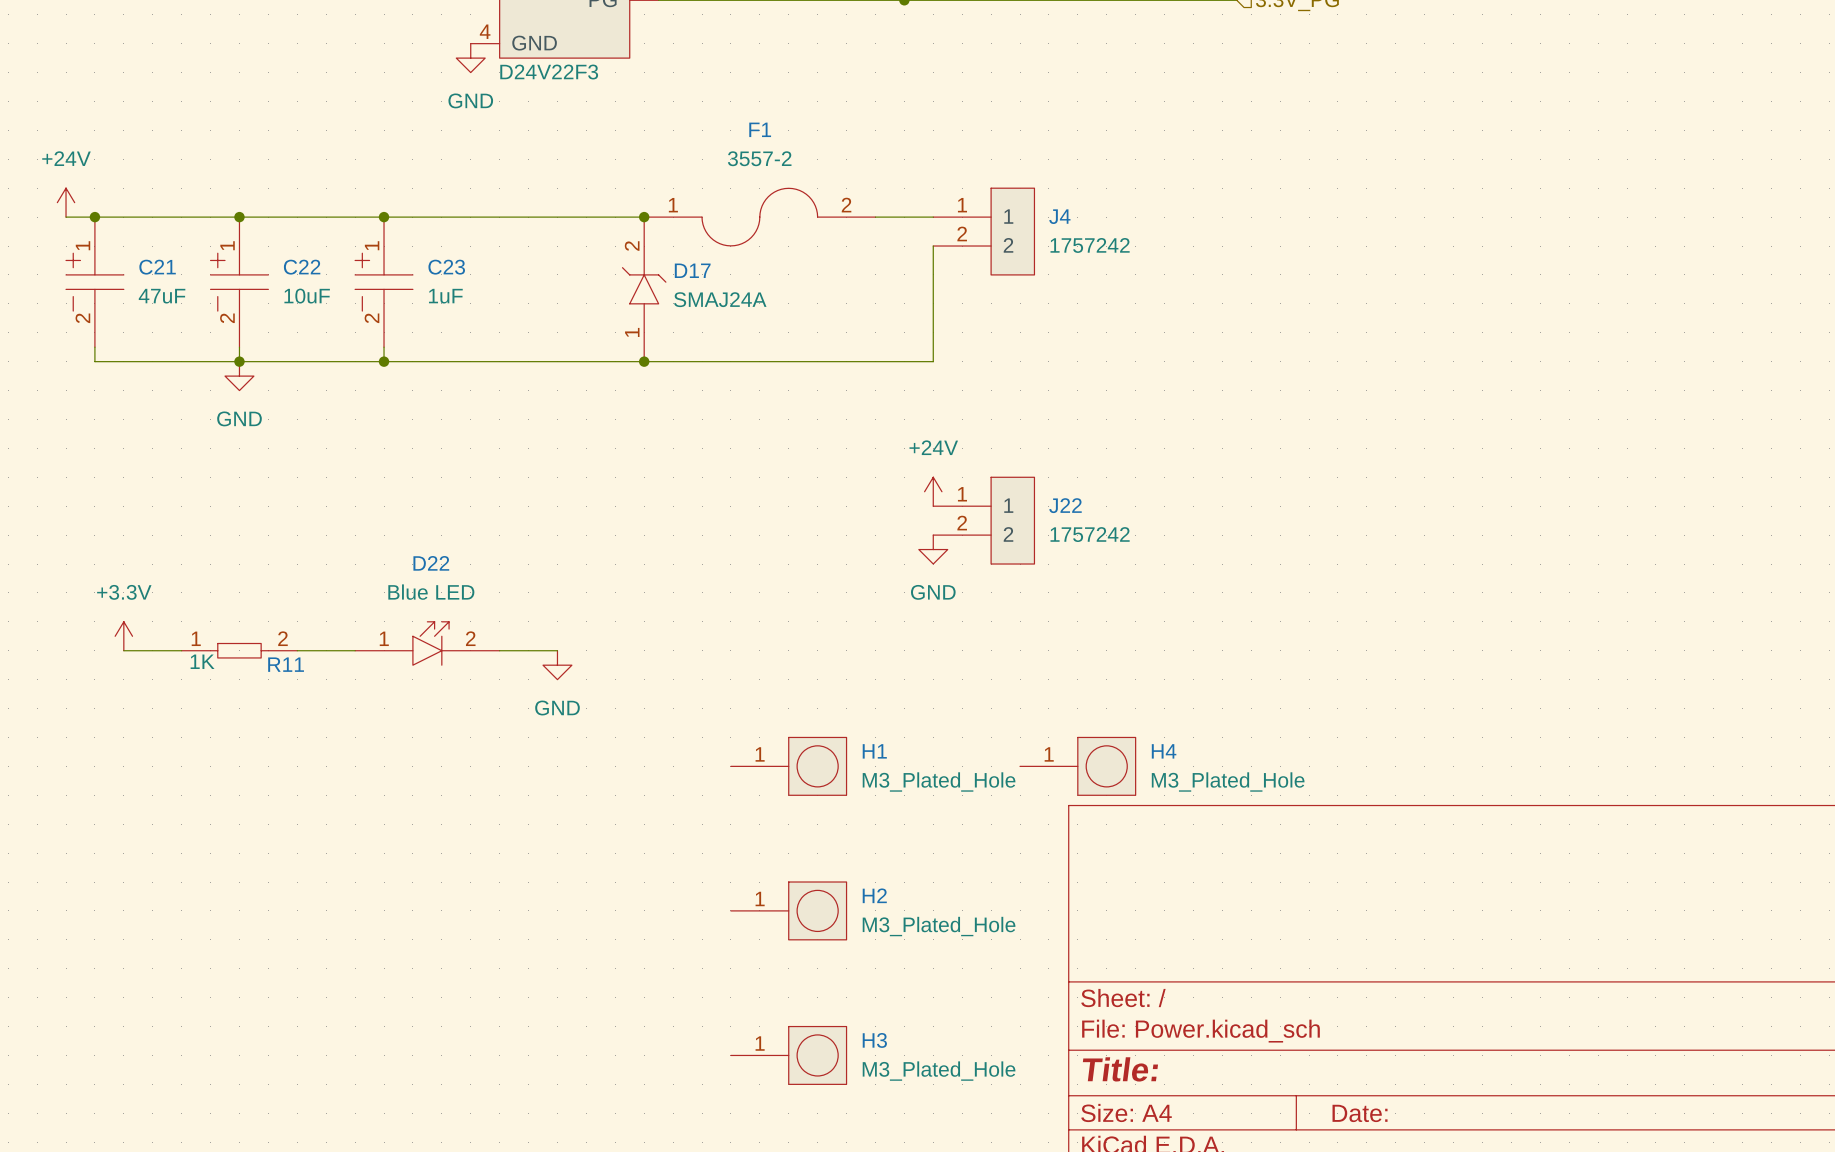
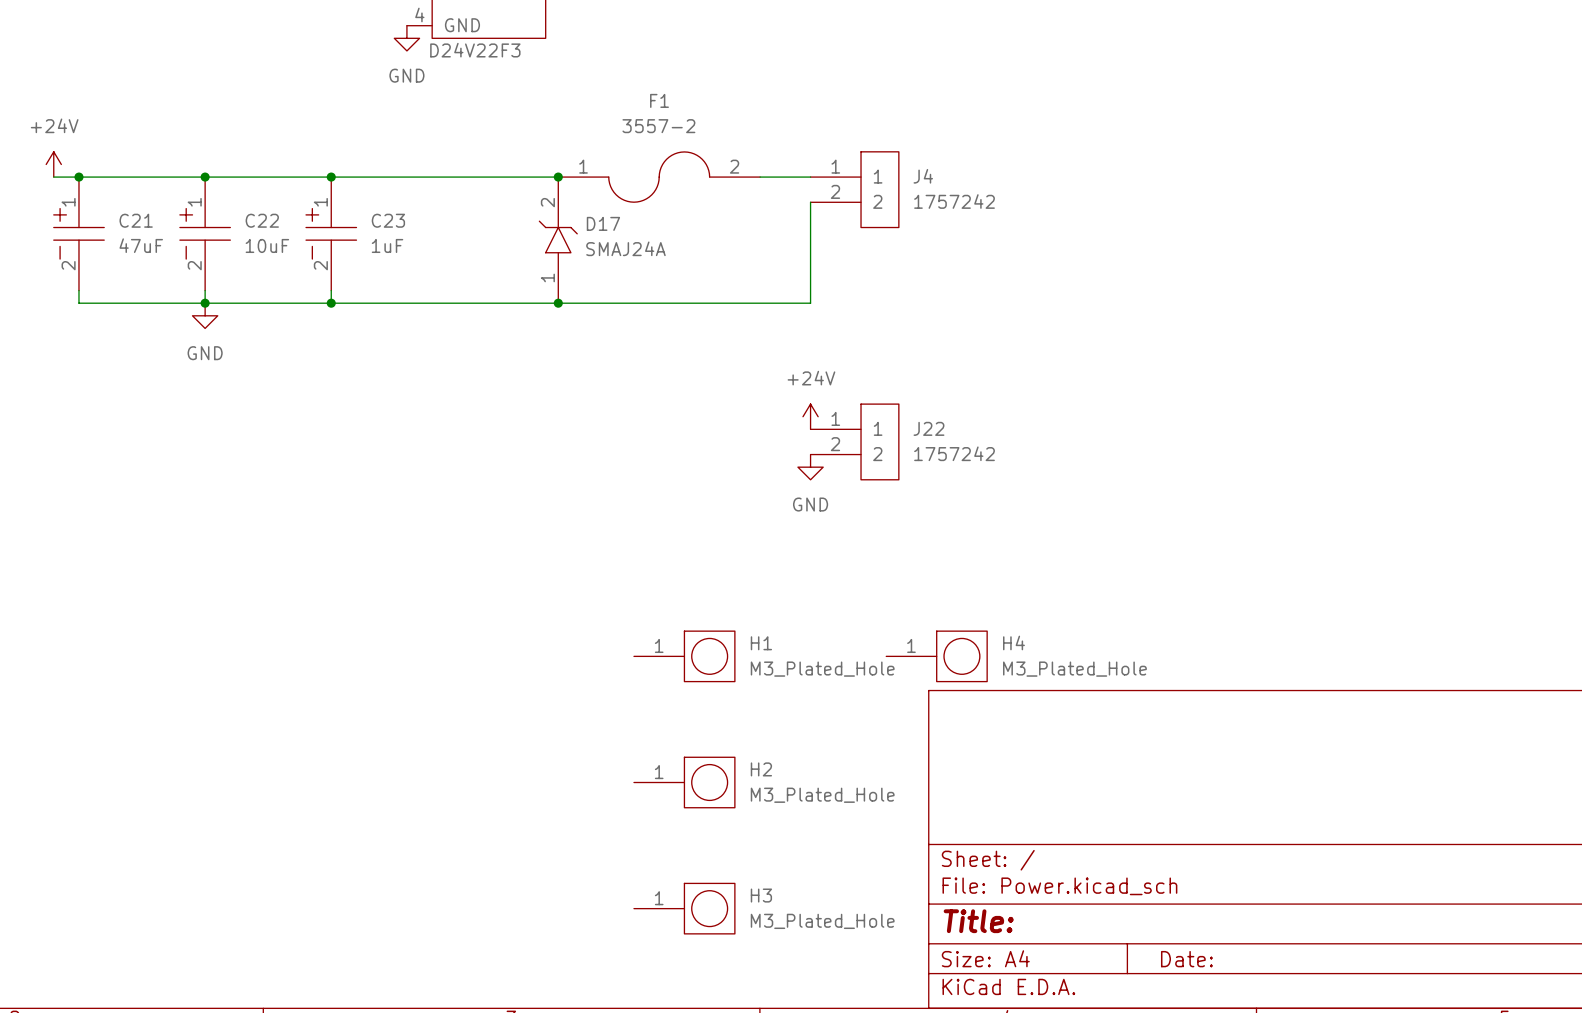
power symbol: +3.3V (123, 636) -> none
D22: (427, 643) -> none
wire: (123, 650) (181, 650) -> none
R11: (239, 650) -> none
wire: (297, 650) (355, 650) -> none
wire: (499, 650) (557, 650) -> none
power symbol: GND (557, 665) -> none

